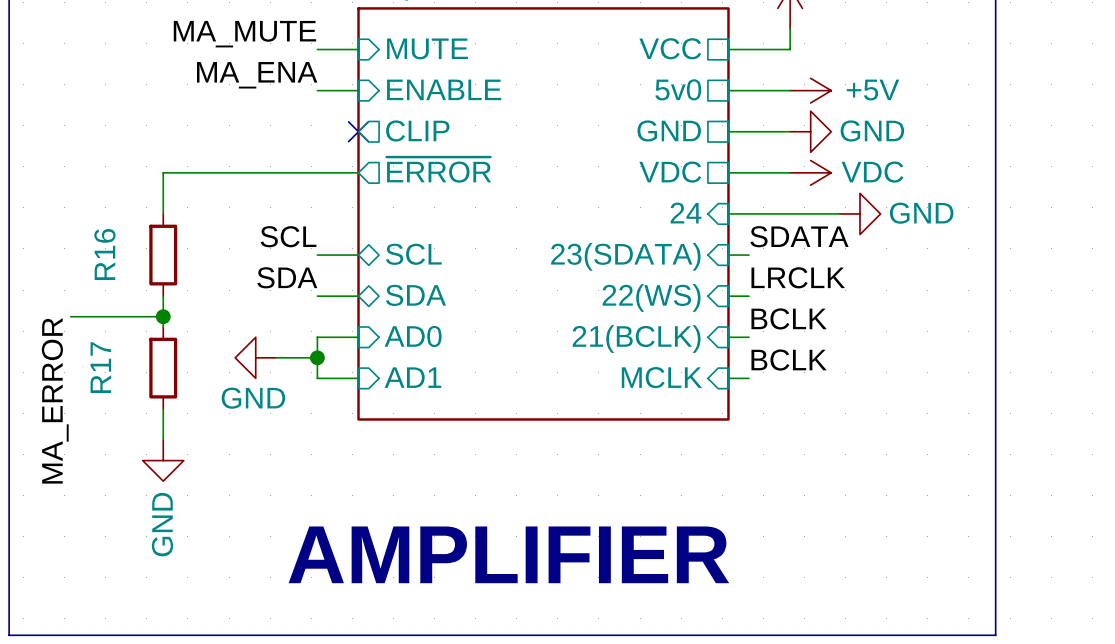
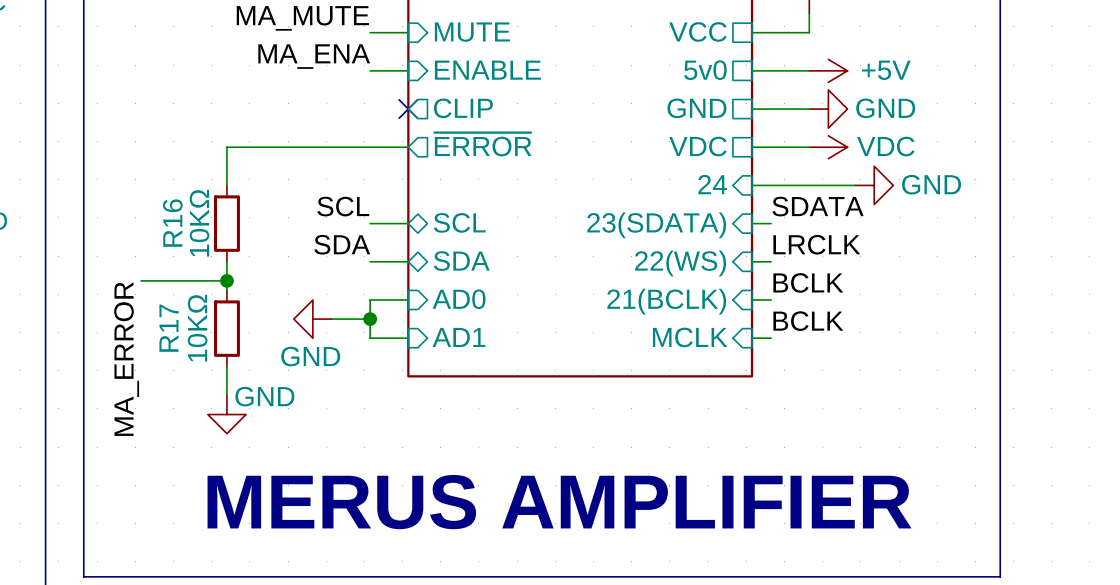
R16 value: none -> 10KΩ (199, 223)
R17 value: none -> 10KΩ (197, 328)
power symbol text rotation: 0° (162, 524) -> 90° clockwise (264, 396)
power symbol text position: GND (162, 524) -> GND (264, 396)
text: AMPLIFIER (508, 554) -> MERUS AMPLIFIER (559, 502)

